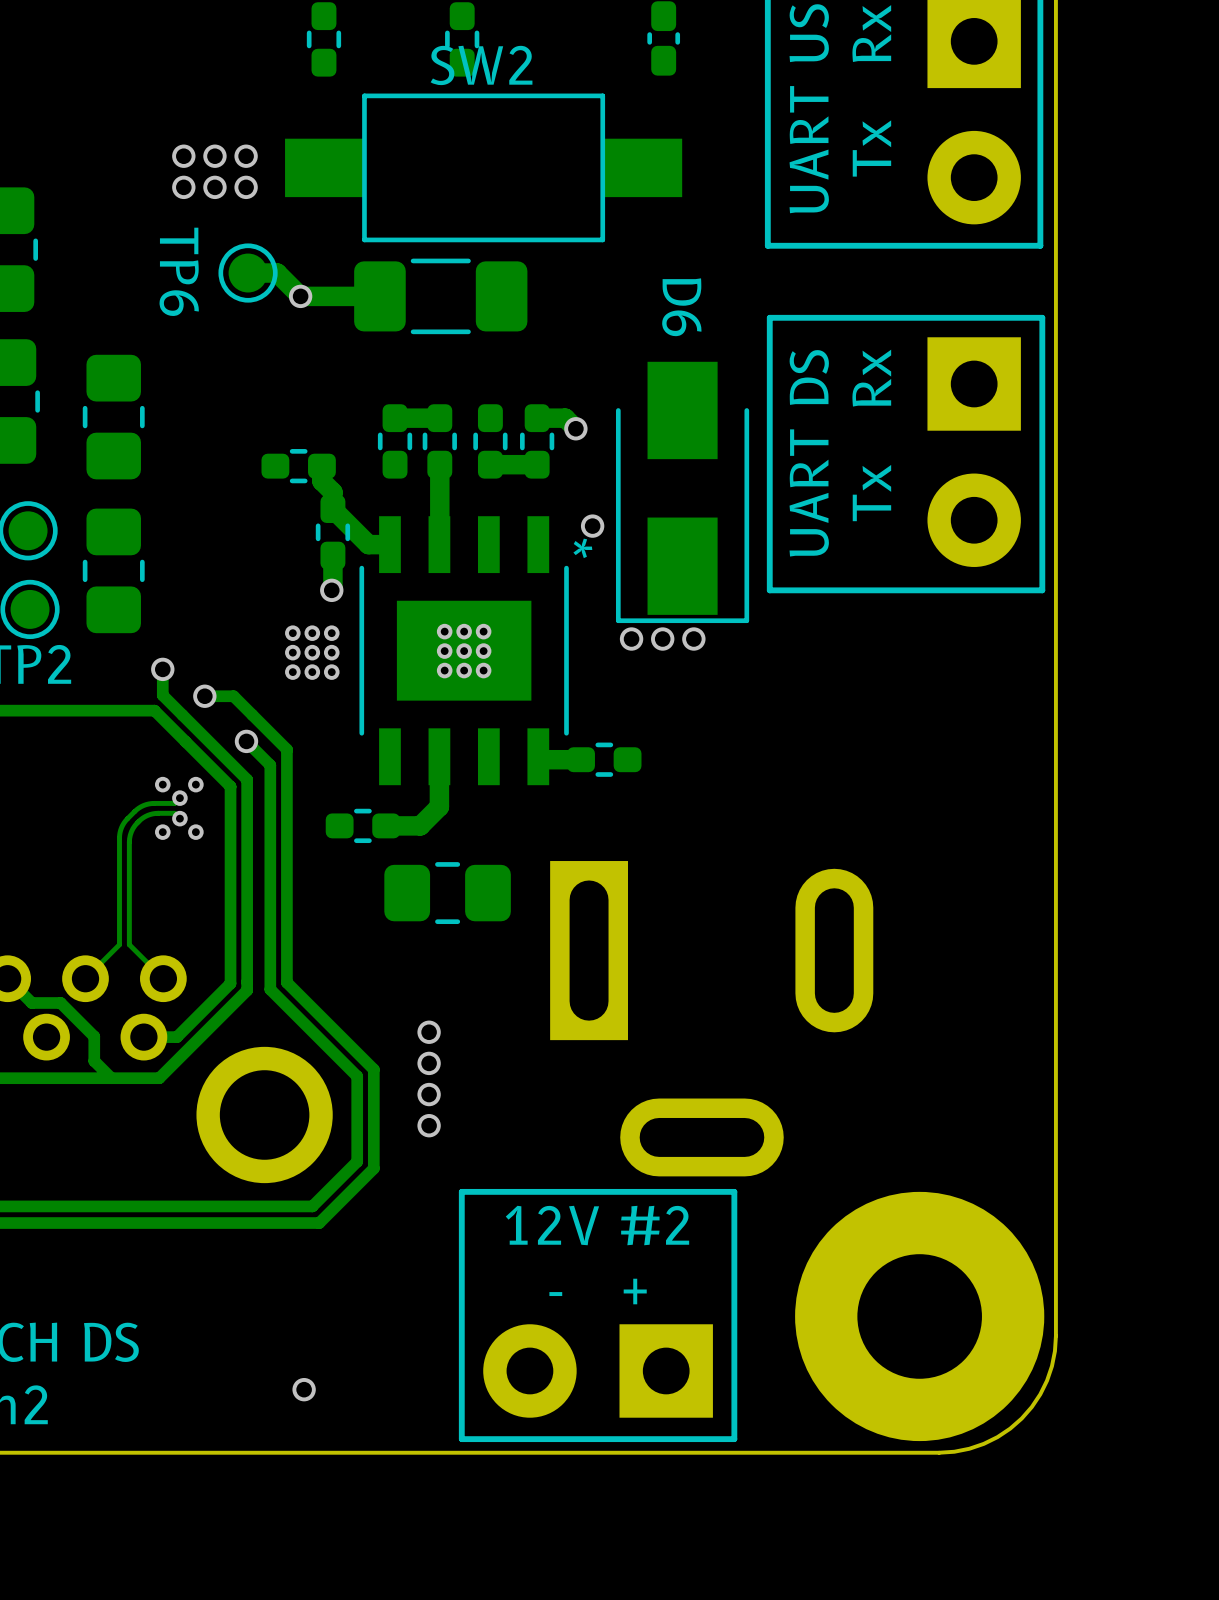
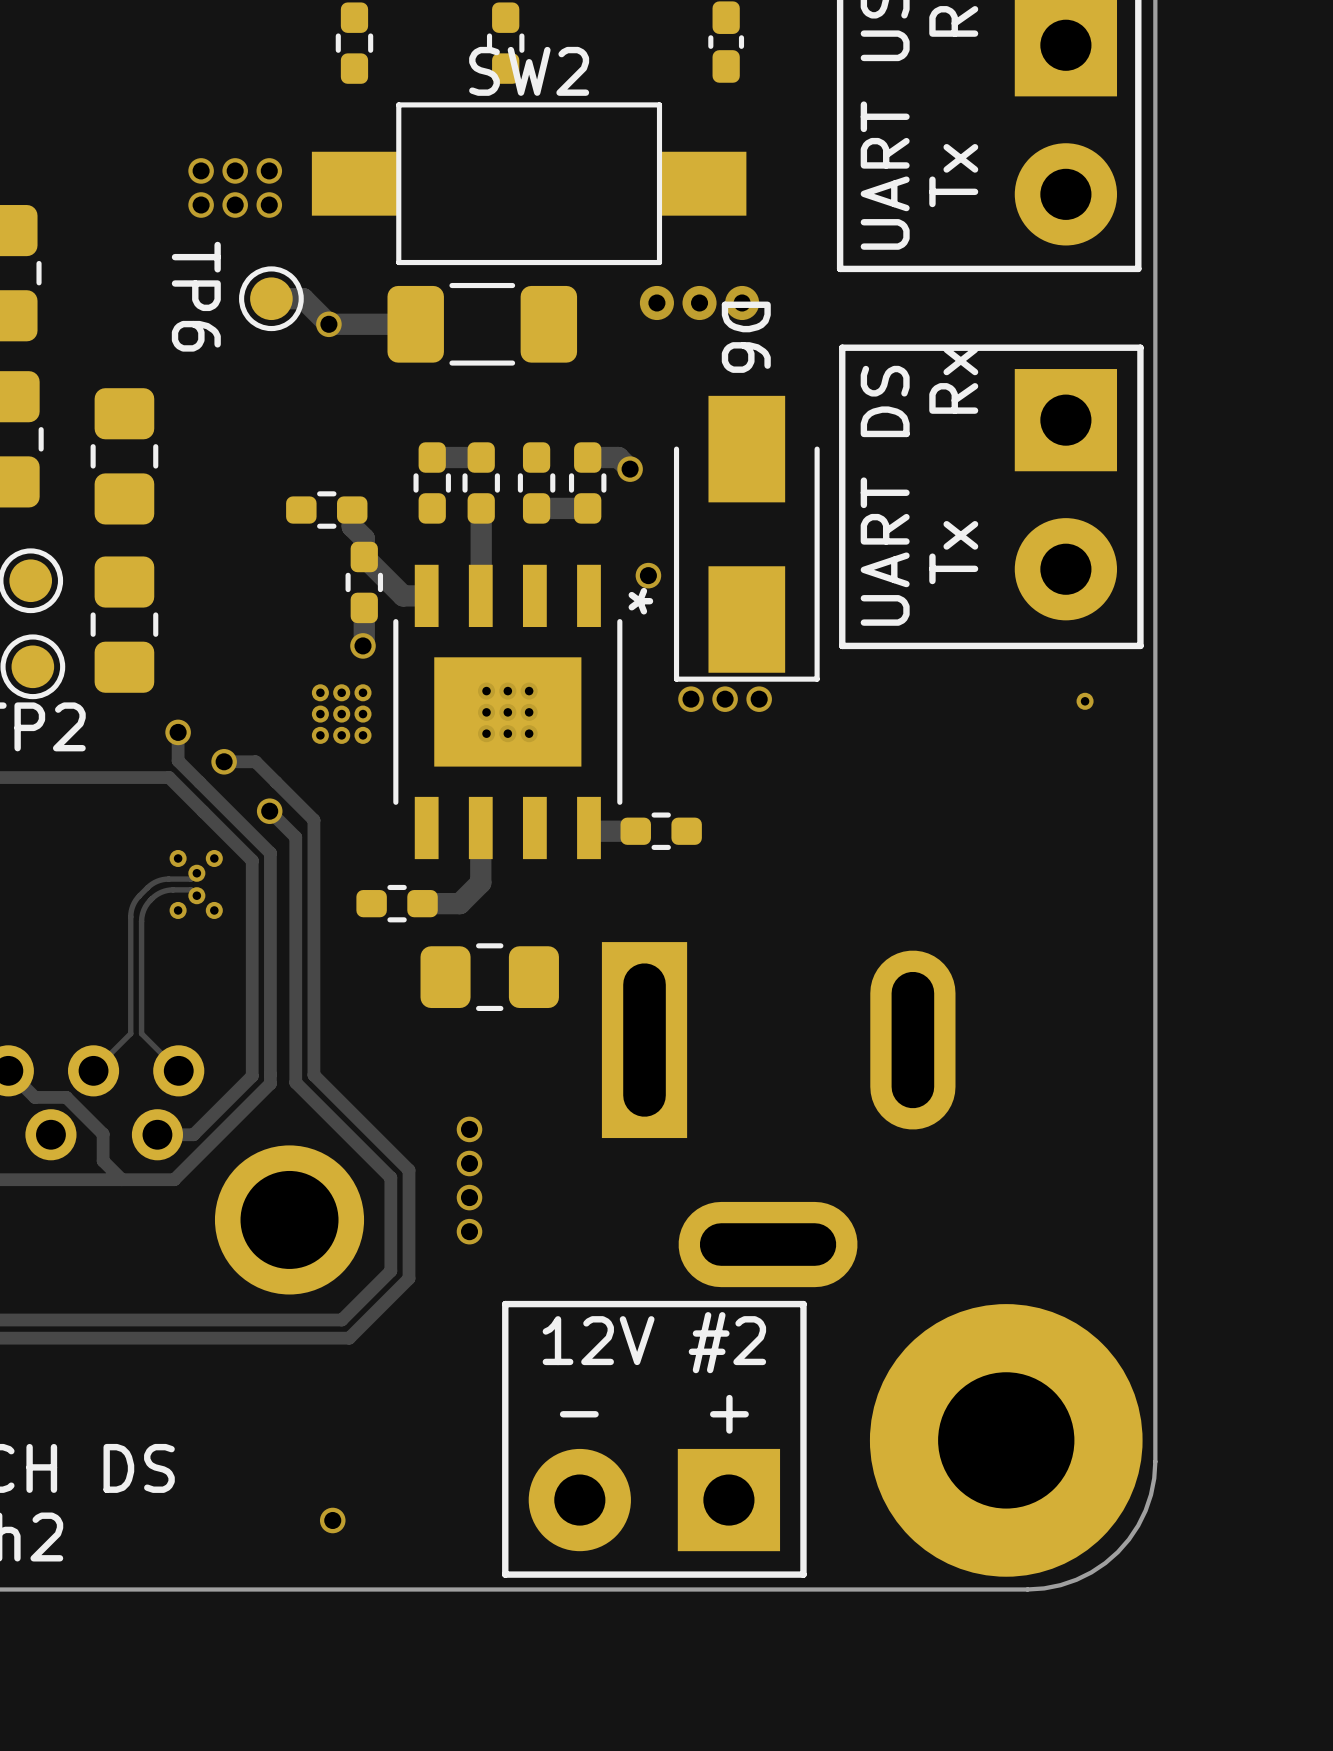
via: none -> (656, 302)
via: none -> (699, 302)
via: none -> (742, 302)
via: none -> (1085, 701)

